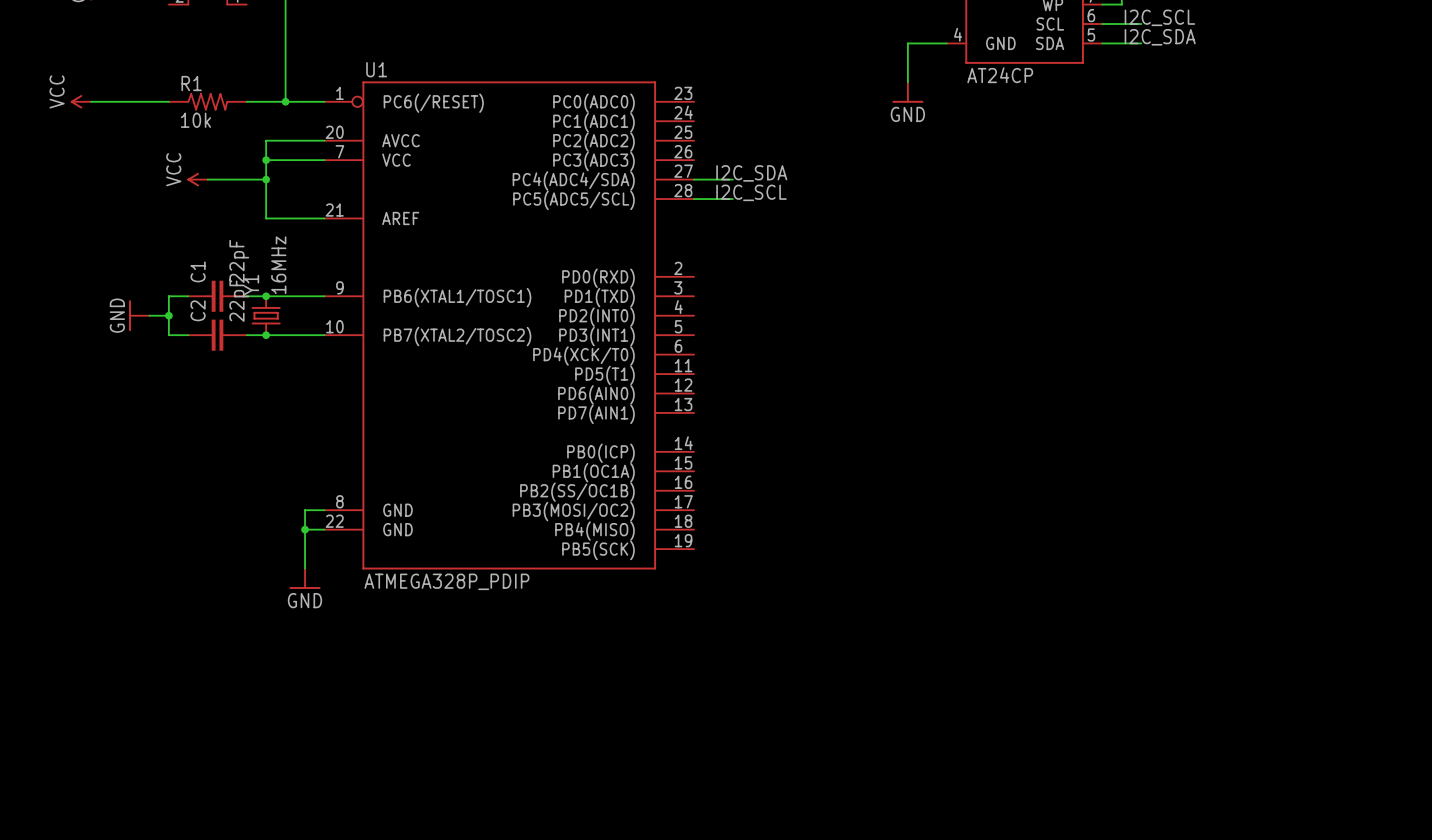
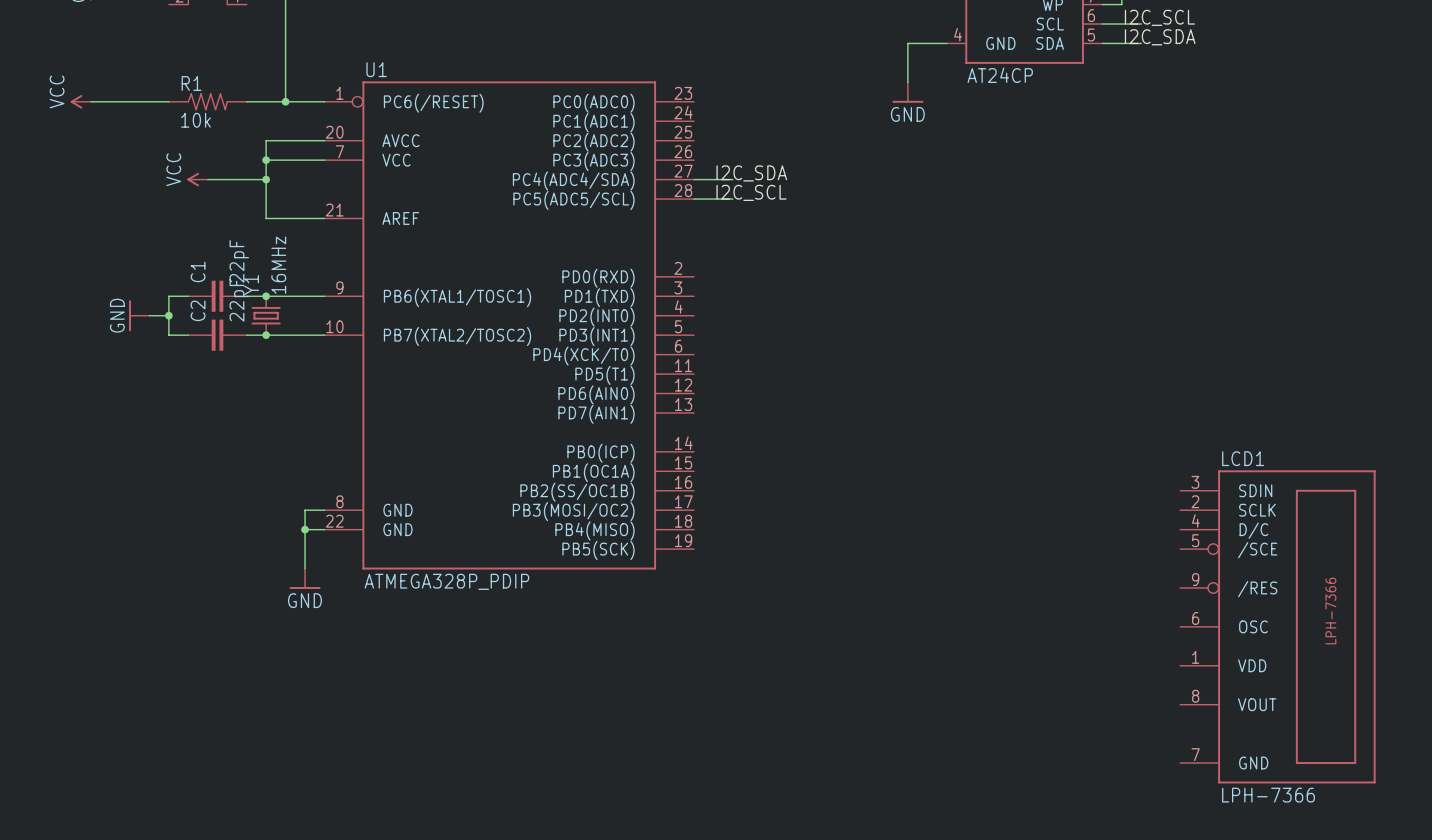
LCD1: none -> LPH-7366 (1277, 626)

